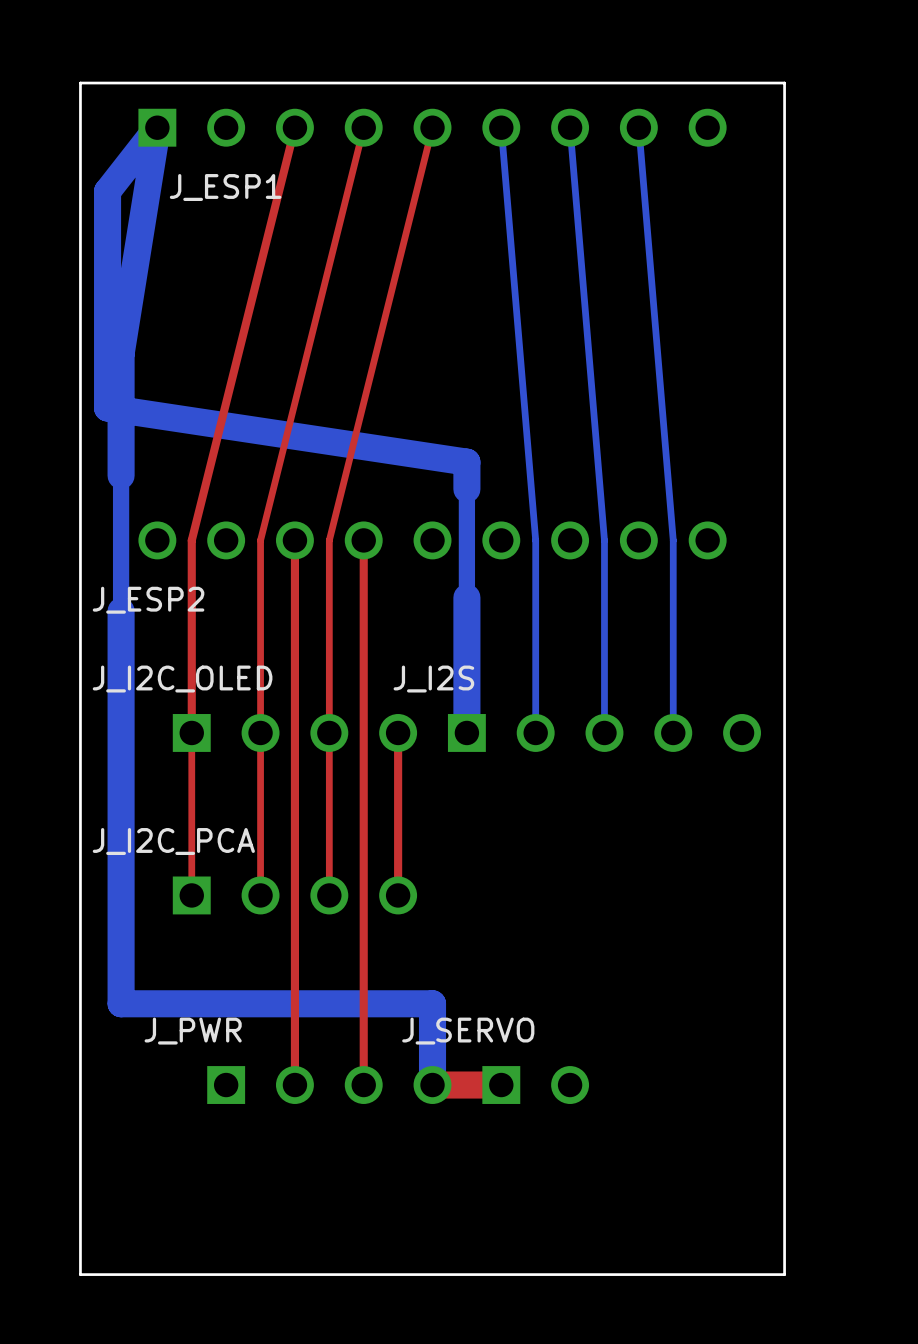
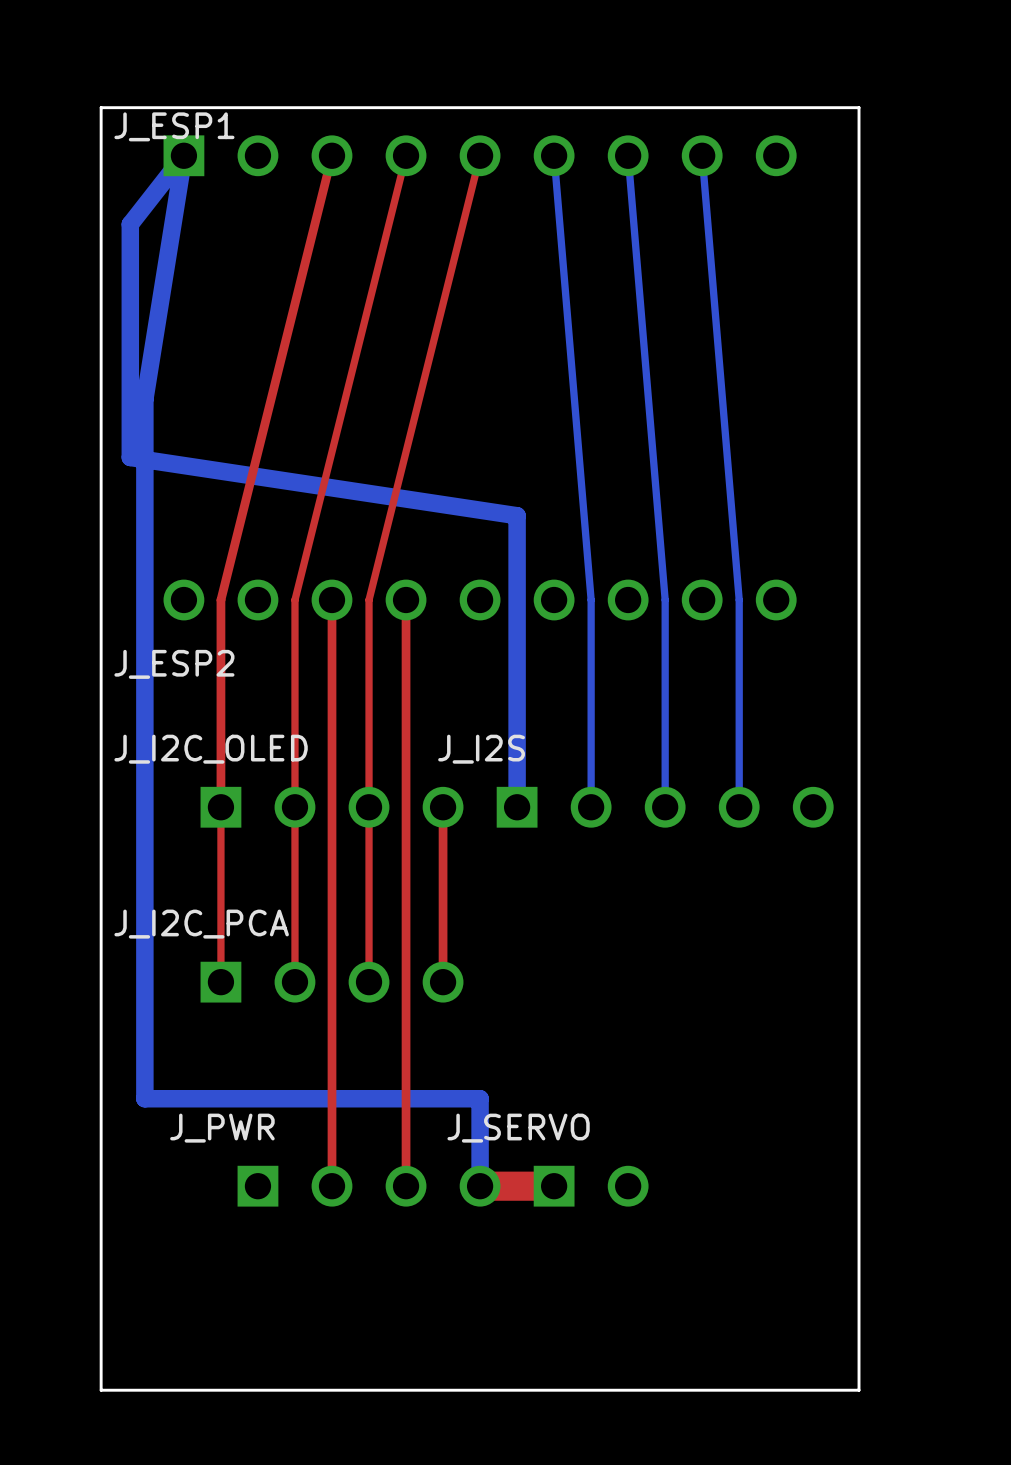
J_ESP1 name position: J_ESP1 (225, 187) -> J_ESP1 (174, 126)
bottom track width: thick (121, 475) (121, 353) (157, 127) (107, 191) (107, 408) (466, 462) (466, 489) -> thin (144, 530) (144, 399) (183, 155) (130, 224) (130, 457) (517, 515) (517, 544)
bottom track width: thick (466, 597) (466, 732) -> thin (517, 661) (517, 807)
bottom track width: thick (121, 611) (121, 1003) (432, 1003) (432, 1085) -> thin (144, 676) (144, 1098) (480, 1098) (480, 1186)

